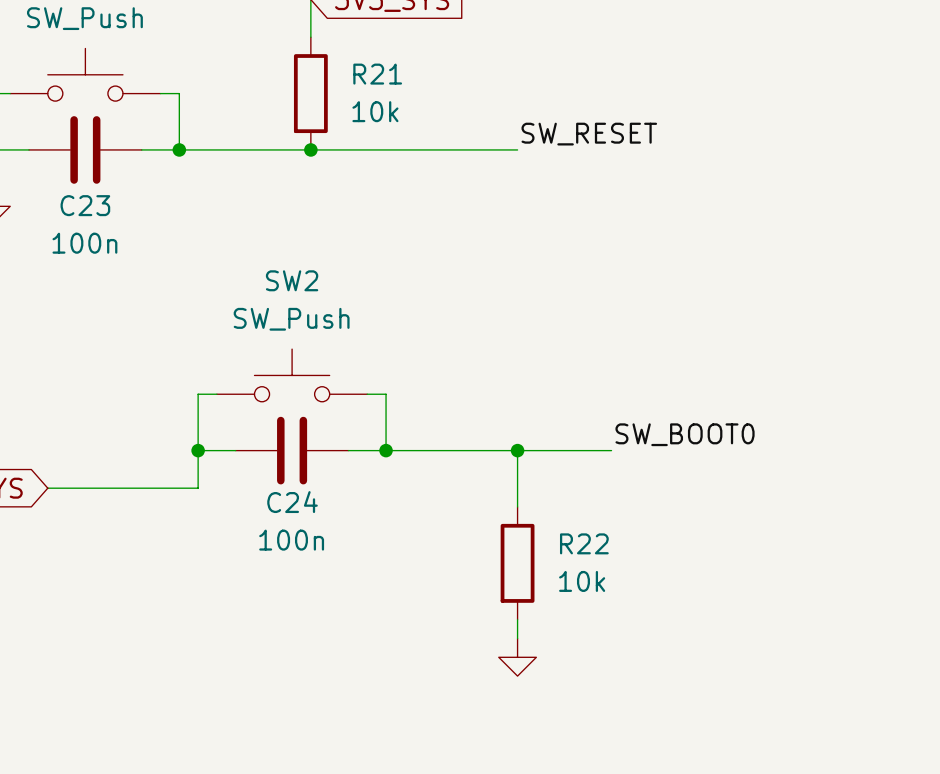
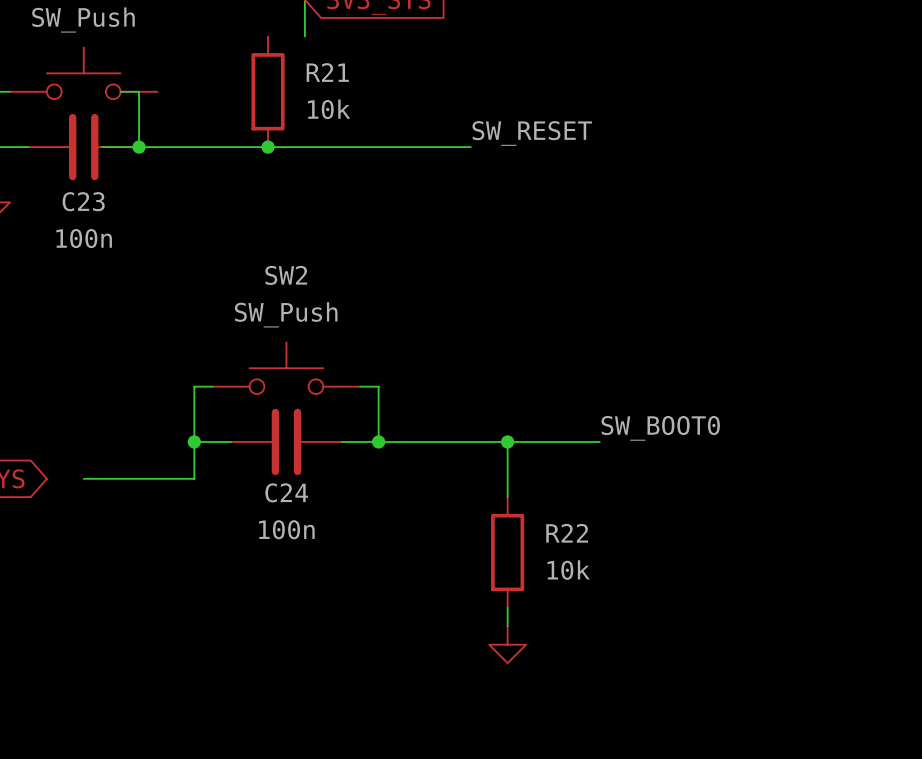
wire: none -> (120, 91) (139, 91) (139, 147) (102, 147)
wire: (160, 93) (179, 93) (179, 149) -> none
R21 position: (310, 93) -> (268, 91)
label position: SW_RESET (589, 134) -> SW_RESET (532, 133)
junction position: (179, 149) -> (139, 147)
junction position: (310, 149) -> (268, 147)
wire: (479, 149) (517, 149) -> none
wire: (47, 488) (85, 488) -> none

